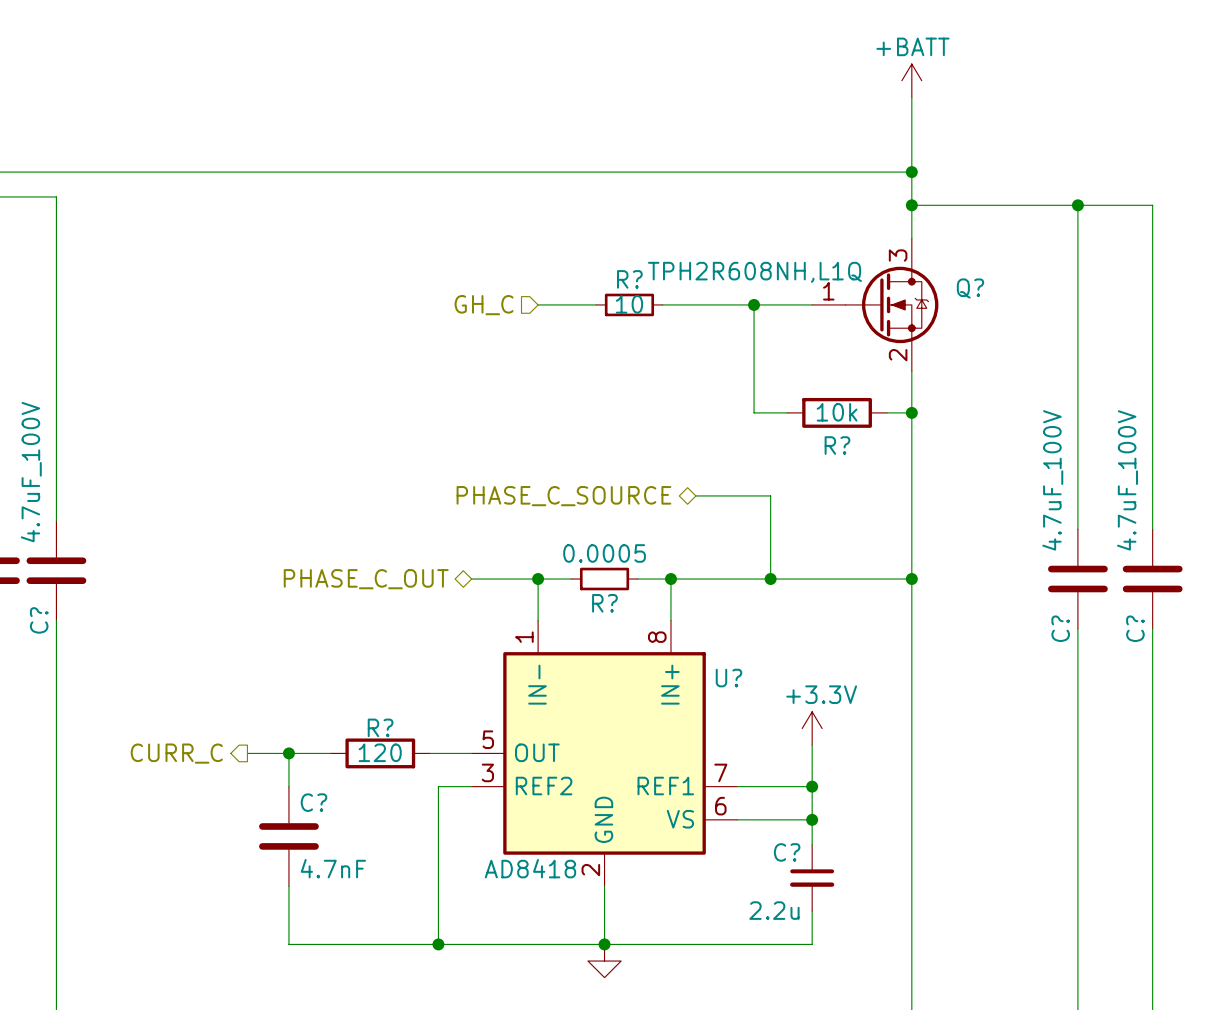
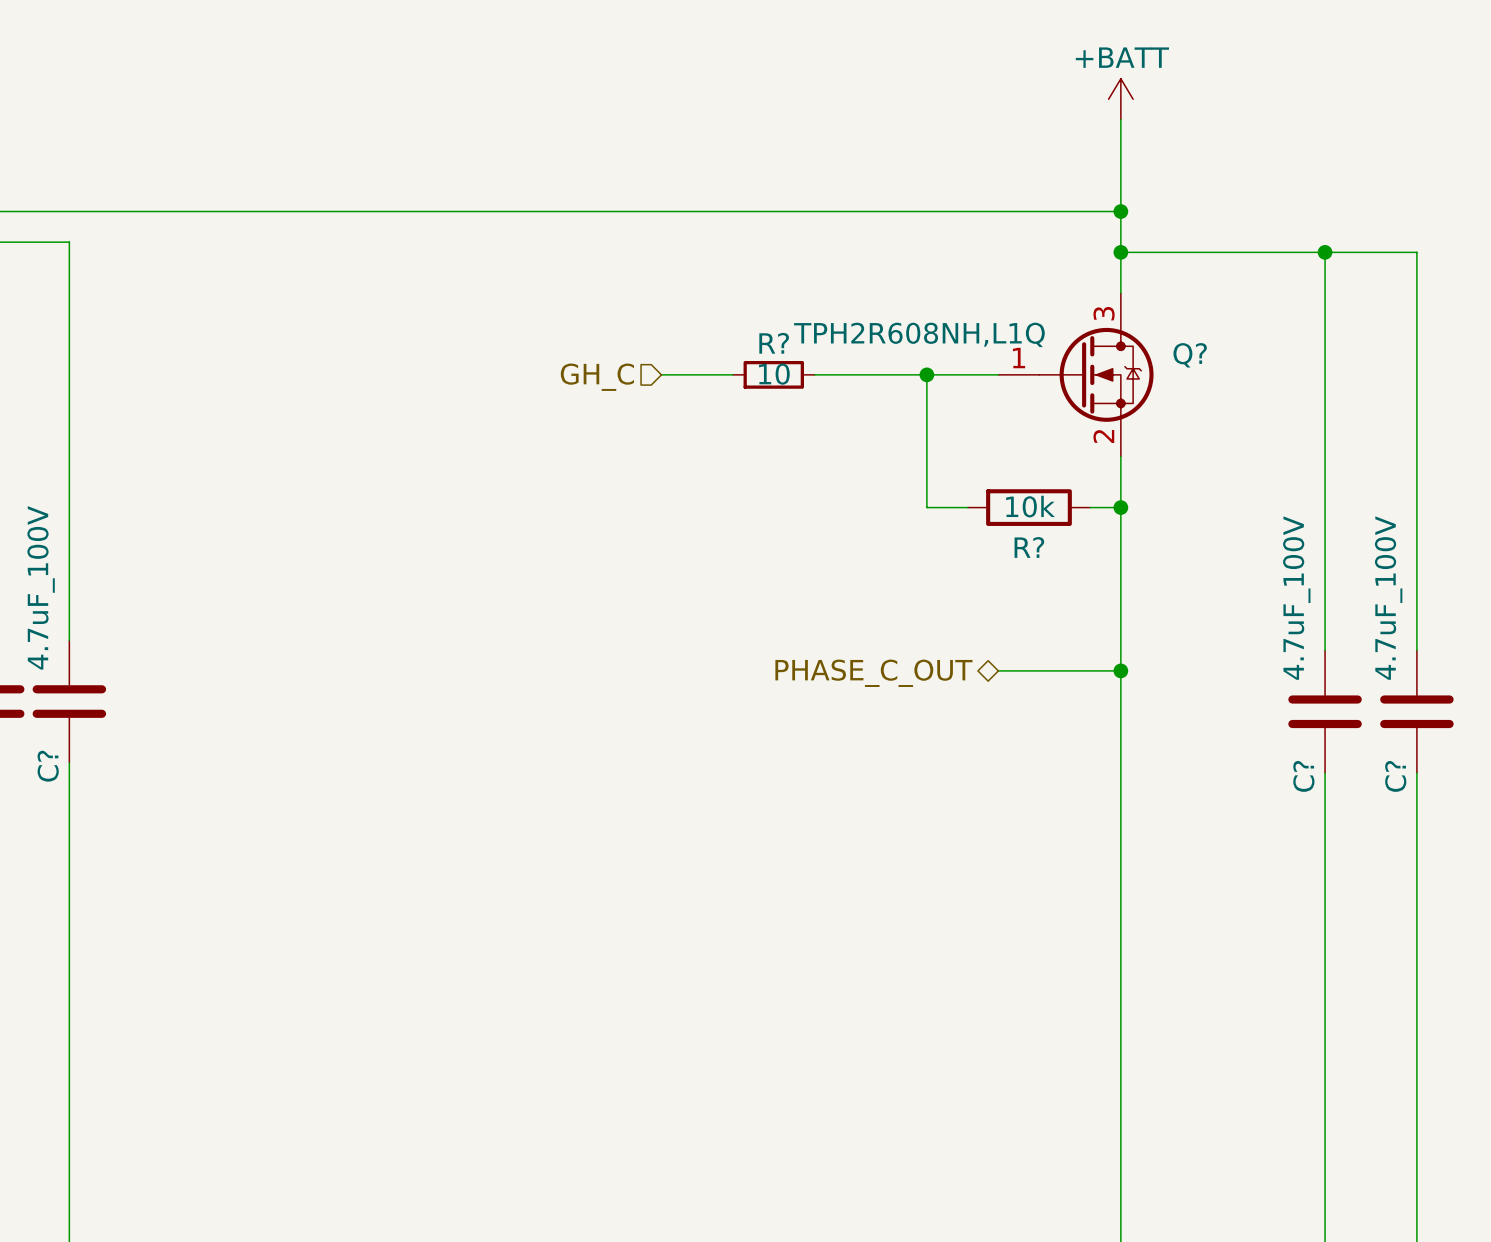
wire: (695, 495) (770, 495) (770, 579) -> none
hierarchical label: PHASE_C_SOURCE (563, 496) -> none
hierarchical label: none -> PHASE_C_OUT (873, 673)
wire: none -> (998, 670) (1120, 670)
hierarchical label: PHASE_C_OUT (366, 579) -> none
wire: (471, 579) (571, 579) -> none
wire: (538, 579) (538, 620) -> none
junction: (538, 579) -> none
R?: 0.0005 (604, 579) -> none
wire: (637, 579) (911, 579) -> none
wire: (670, 579) (670, 620) -> none
junction: (670, 579) -> none
junction: (770, 579) -> none
junction position: (911, 579) -> (1120, 670)
power symbol: +3.3V (812, 728) -> none
wire: (812, 745) (812, 844) -> none
hierarchical label: CURR_C (176, 753) -> none
wire: (247, 753) (330, 753) -> none
wire: (288, 753) (288, 786) -> none
junction: (288, 753) -> none
R?: 120 (380, 753) -> none
wire: (430, 753) (471, 753) -> none
U?: AD8418 (604, 753) -> none
wire: (471, 786) (438, 786) (438, 944) -> none
wire: (737, 786) (812, 786) -> none
junction: (812, 786) -> none
wire: (737, 819) (812, 819) -> none
junction: (812, 819) -> none
C?: 4.7nF (288, 836) -> none
C?: 2.2u (812, 877) -> none
wire: (288, 886) (288, 944) (812, 944) (812, 911) -> none
wire: (604, 886) (604, 944) -> none
junction: (438, 944) -> none
junction: (604, 944) -> none
power symbol: (604, 961) -> none

